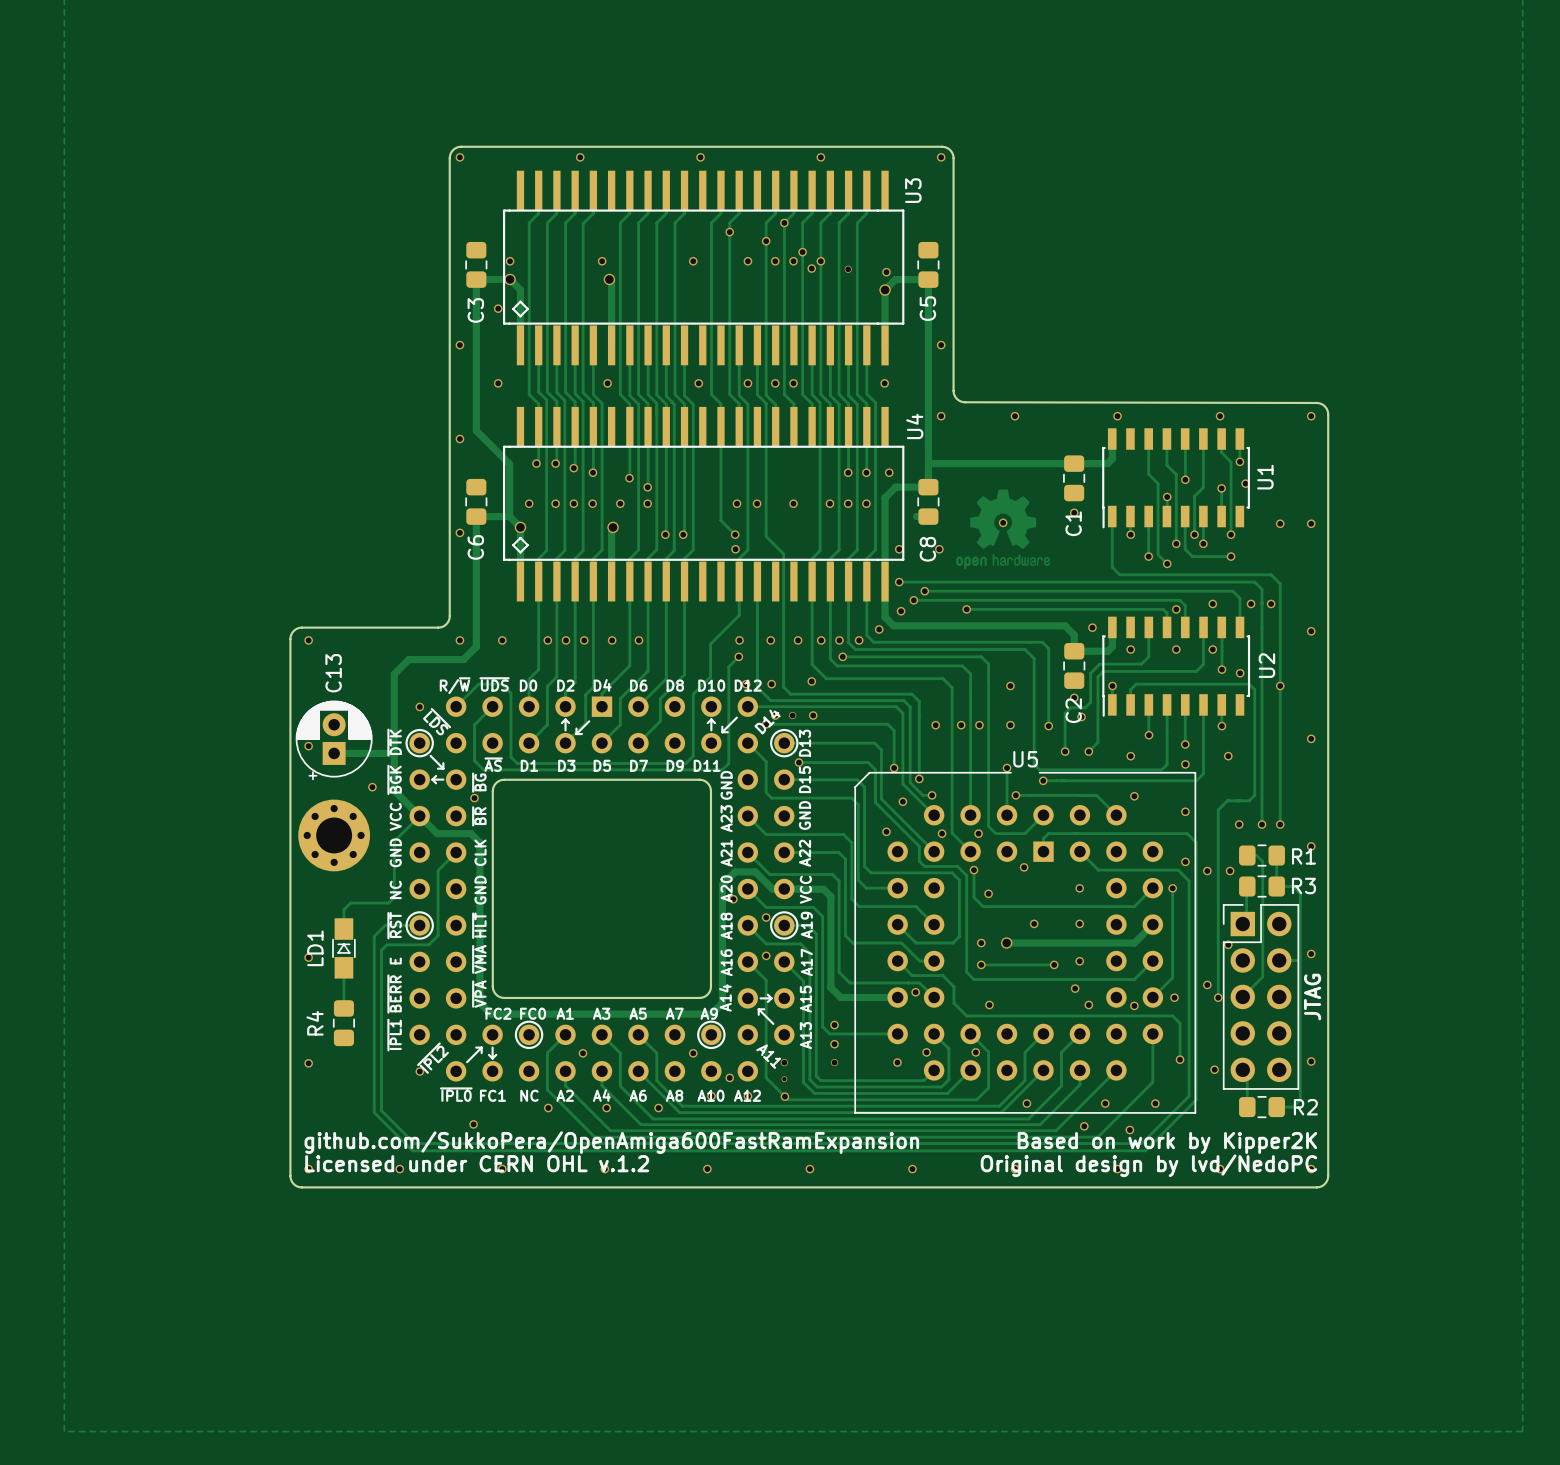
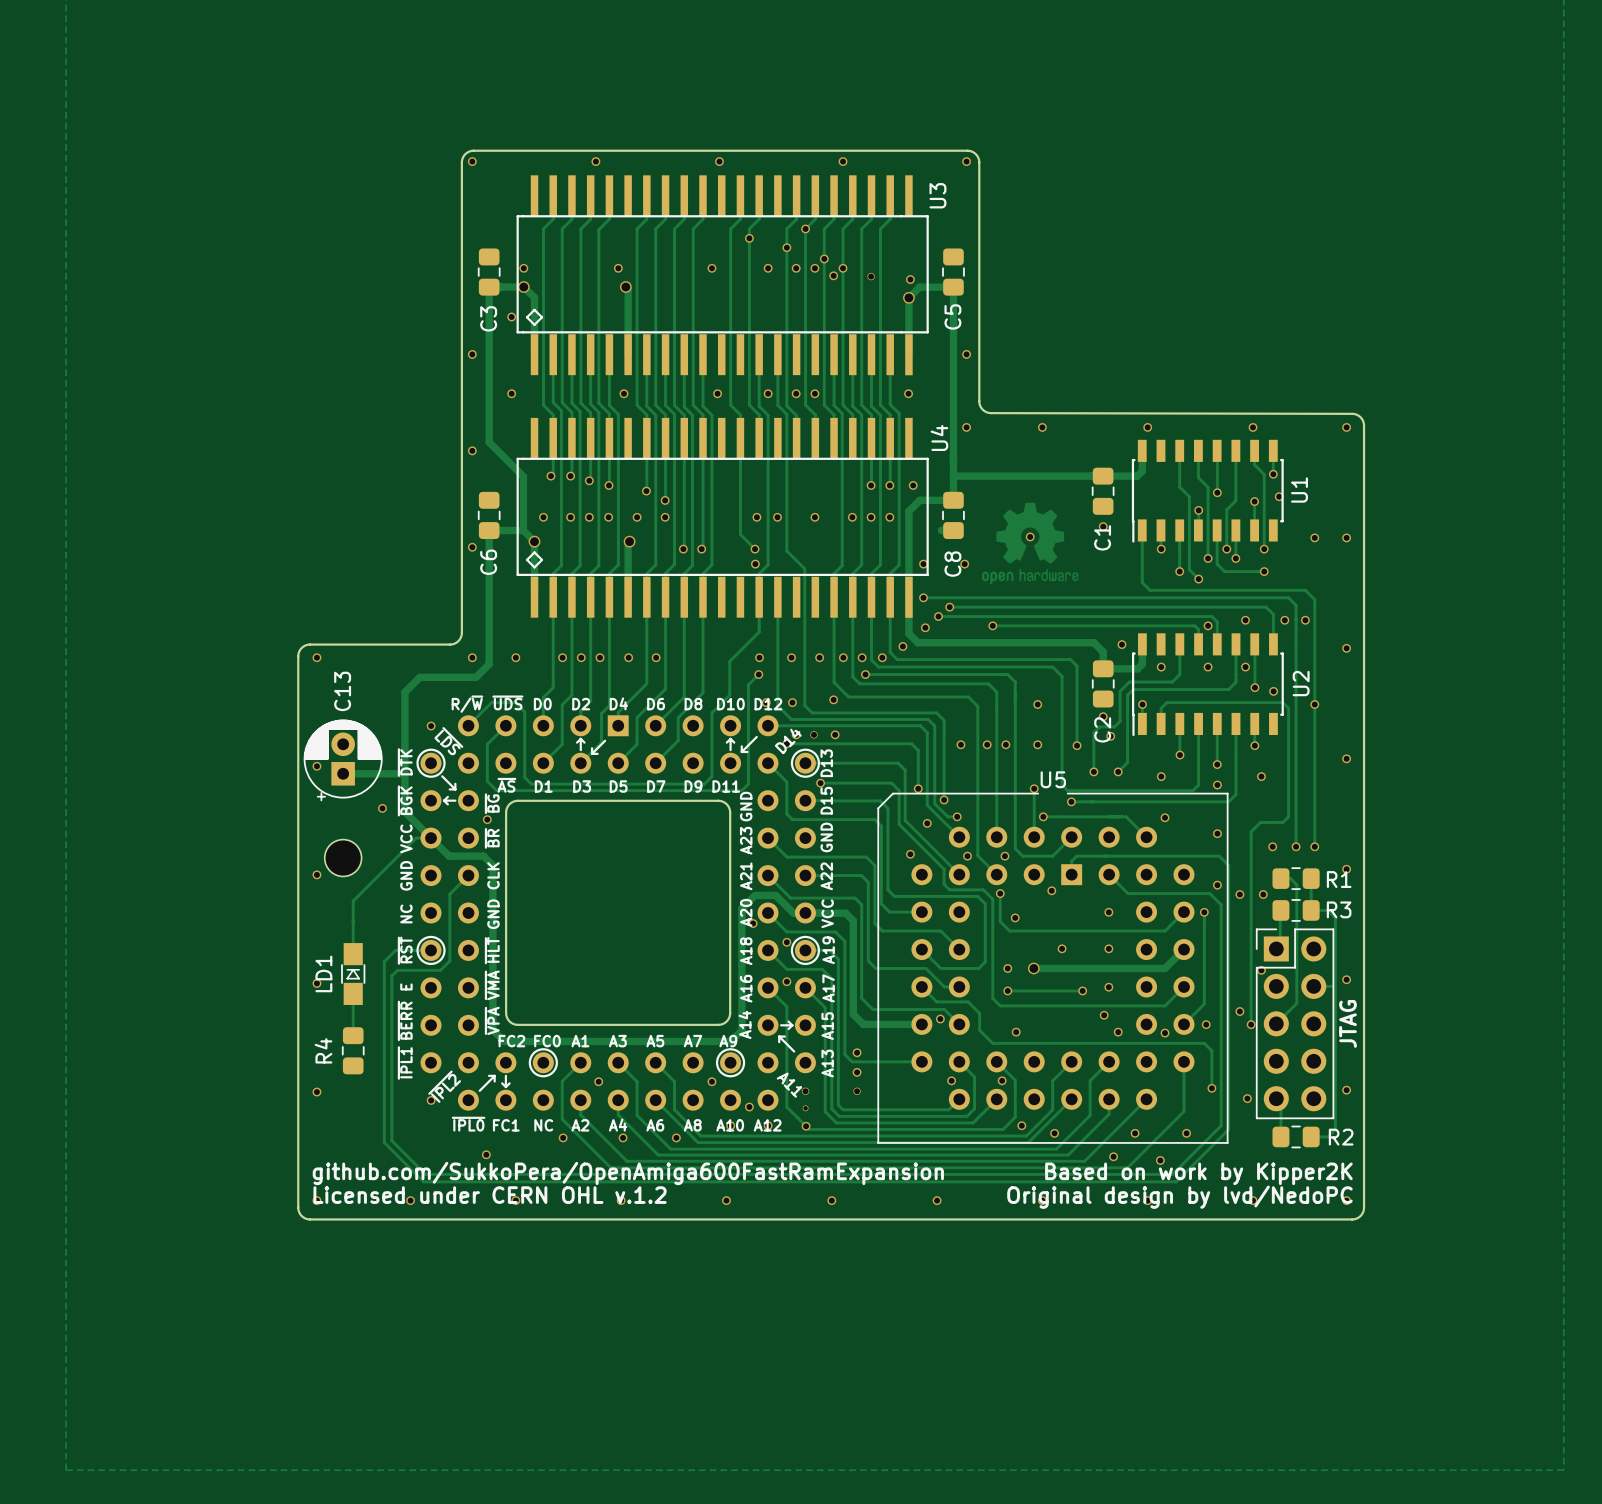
part footprint: [298, 799, 371, 872] -> [324, 839, 362, 877]
track: (419, 816) (394, 841) (394, 897) (388, 903) (350, 903) (343, 909) -> (431, 838) (416, 838) (353, 901) (353, 934)
via: none -> (316, 874)
via: (897, 1062) -> none
via: none -> (1021, 1125)

